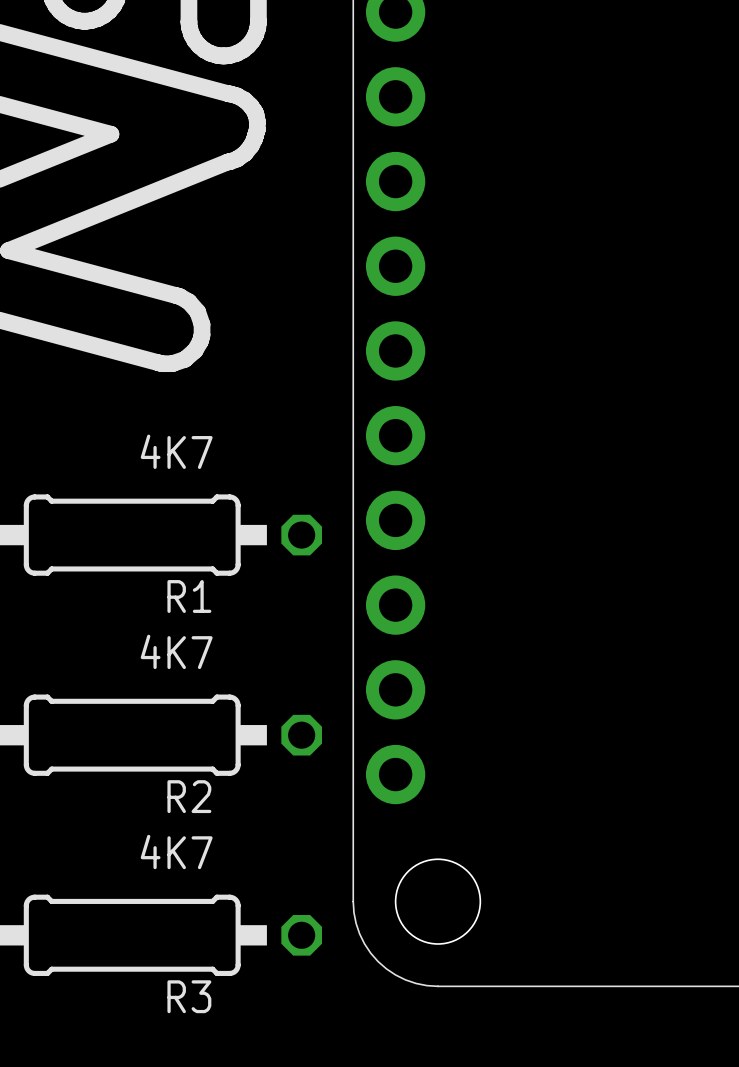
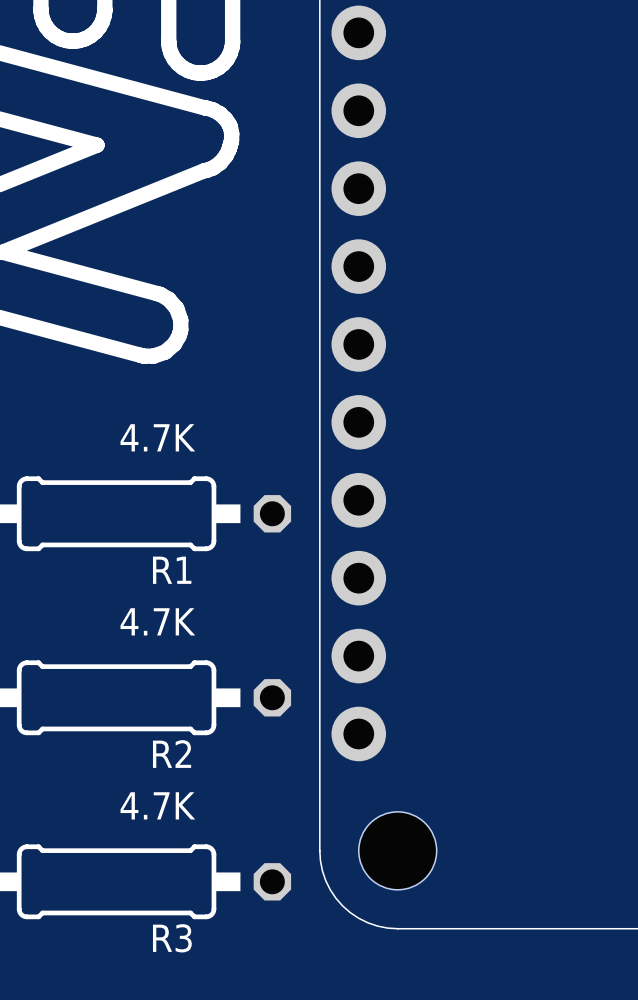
R1 value: 4K7 (176, 451) -> 4.7K (157, 437)
R2 value: 4K7 (176, 651) -> 4.7K (157, 621)
R3 value: 4K7 (176, 852) -> 4.7K (157, 805)

